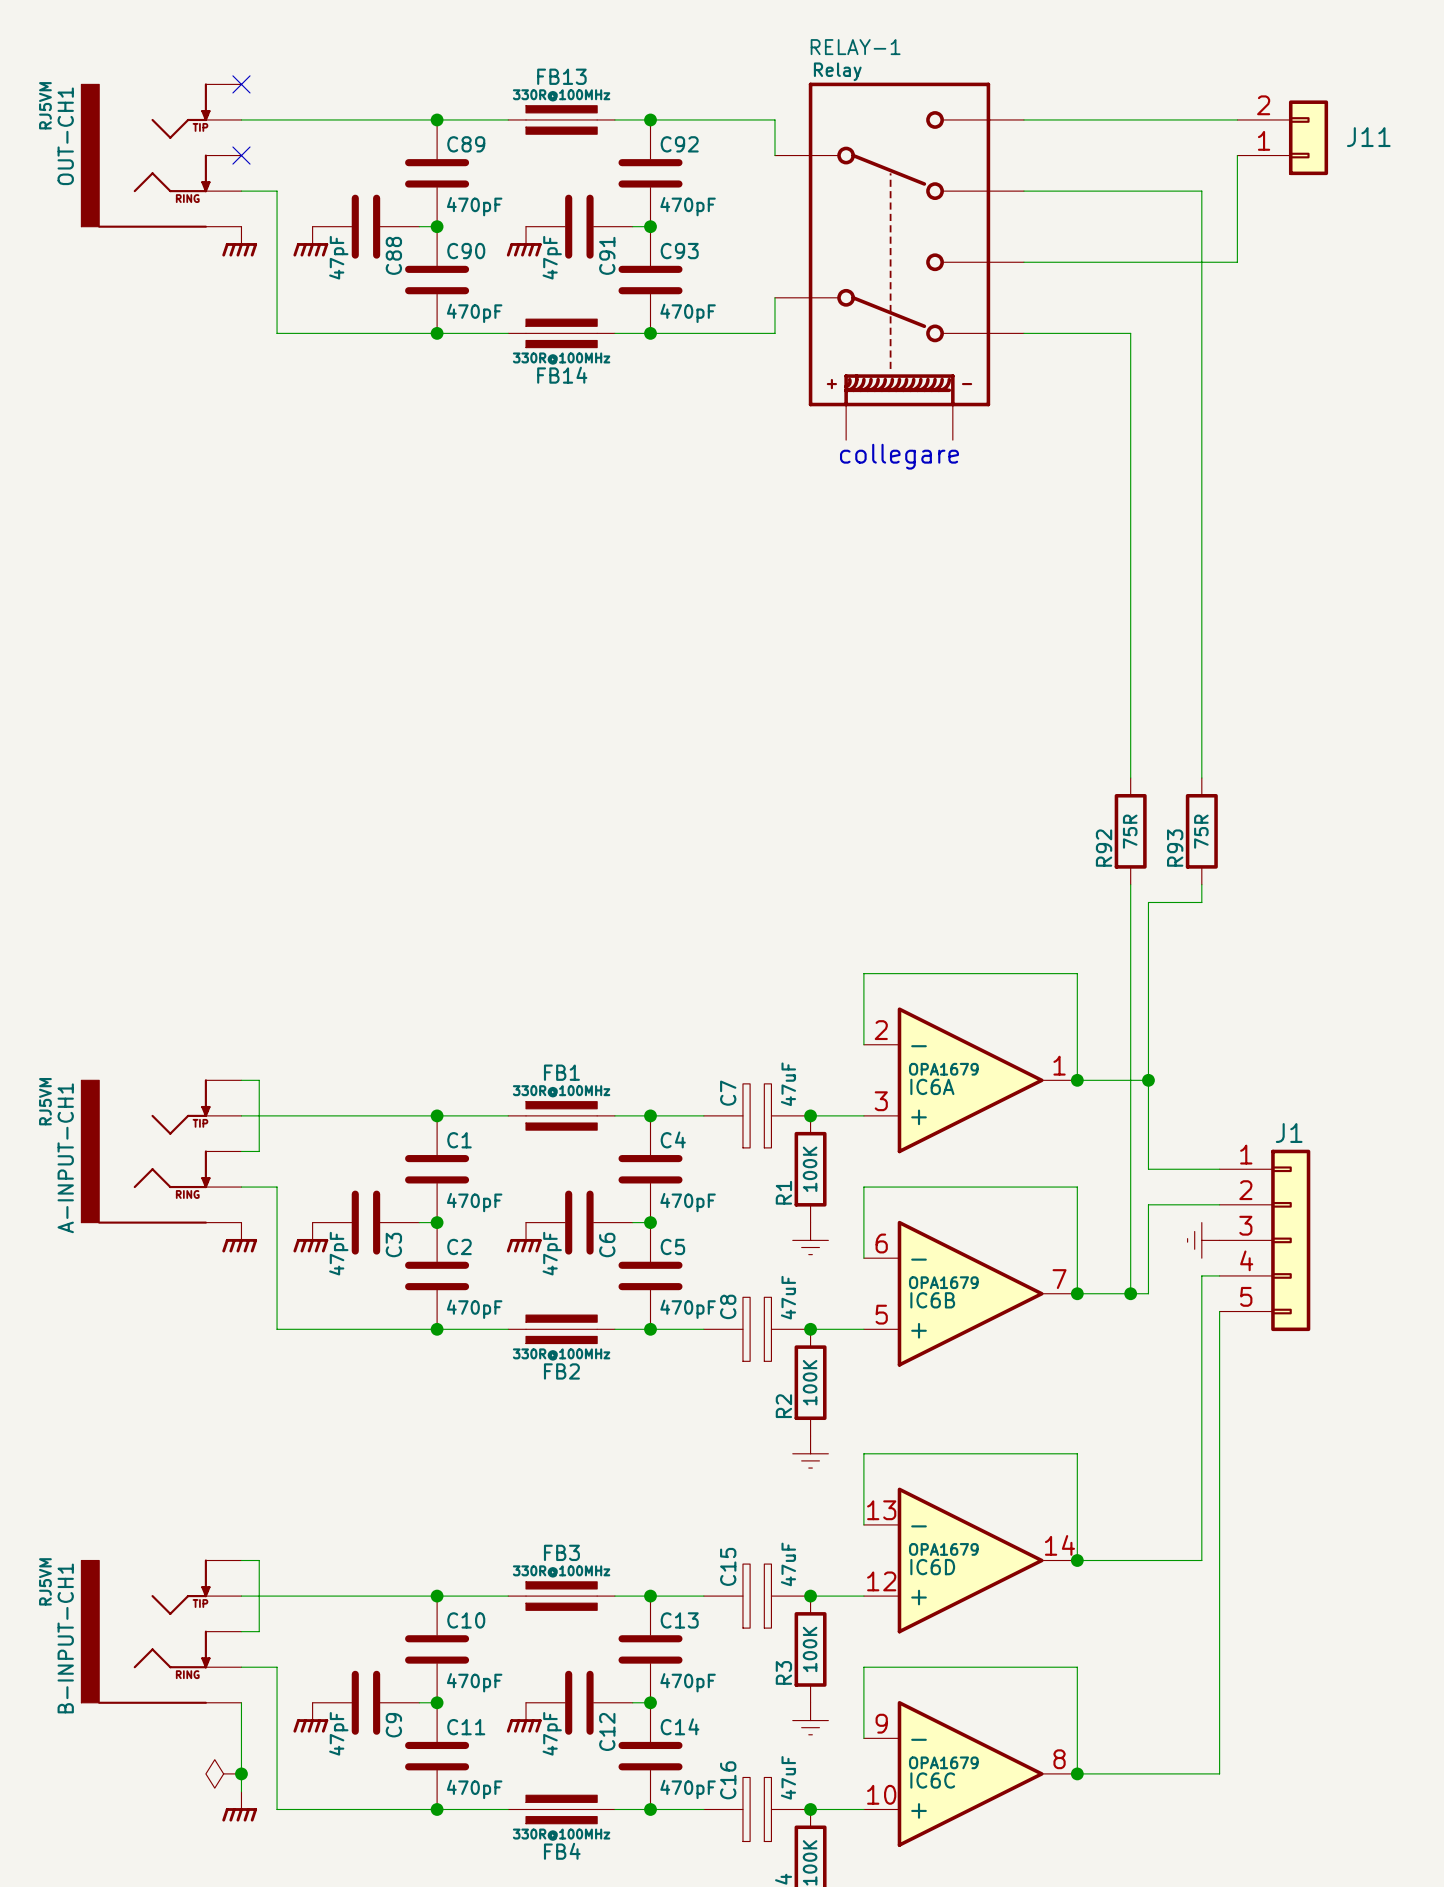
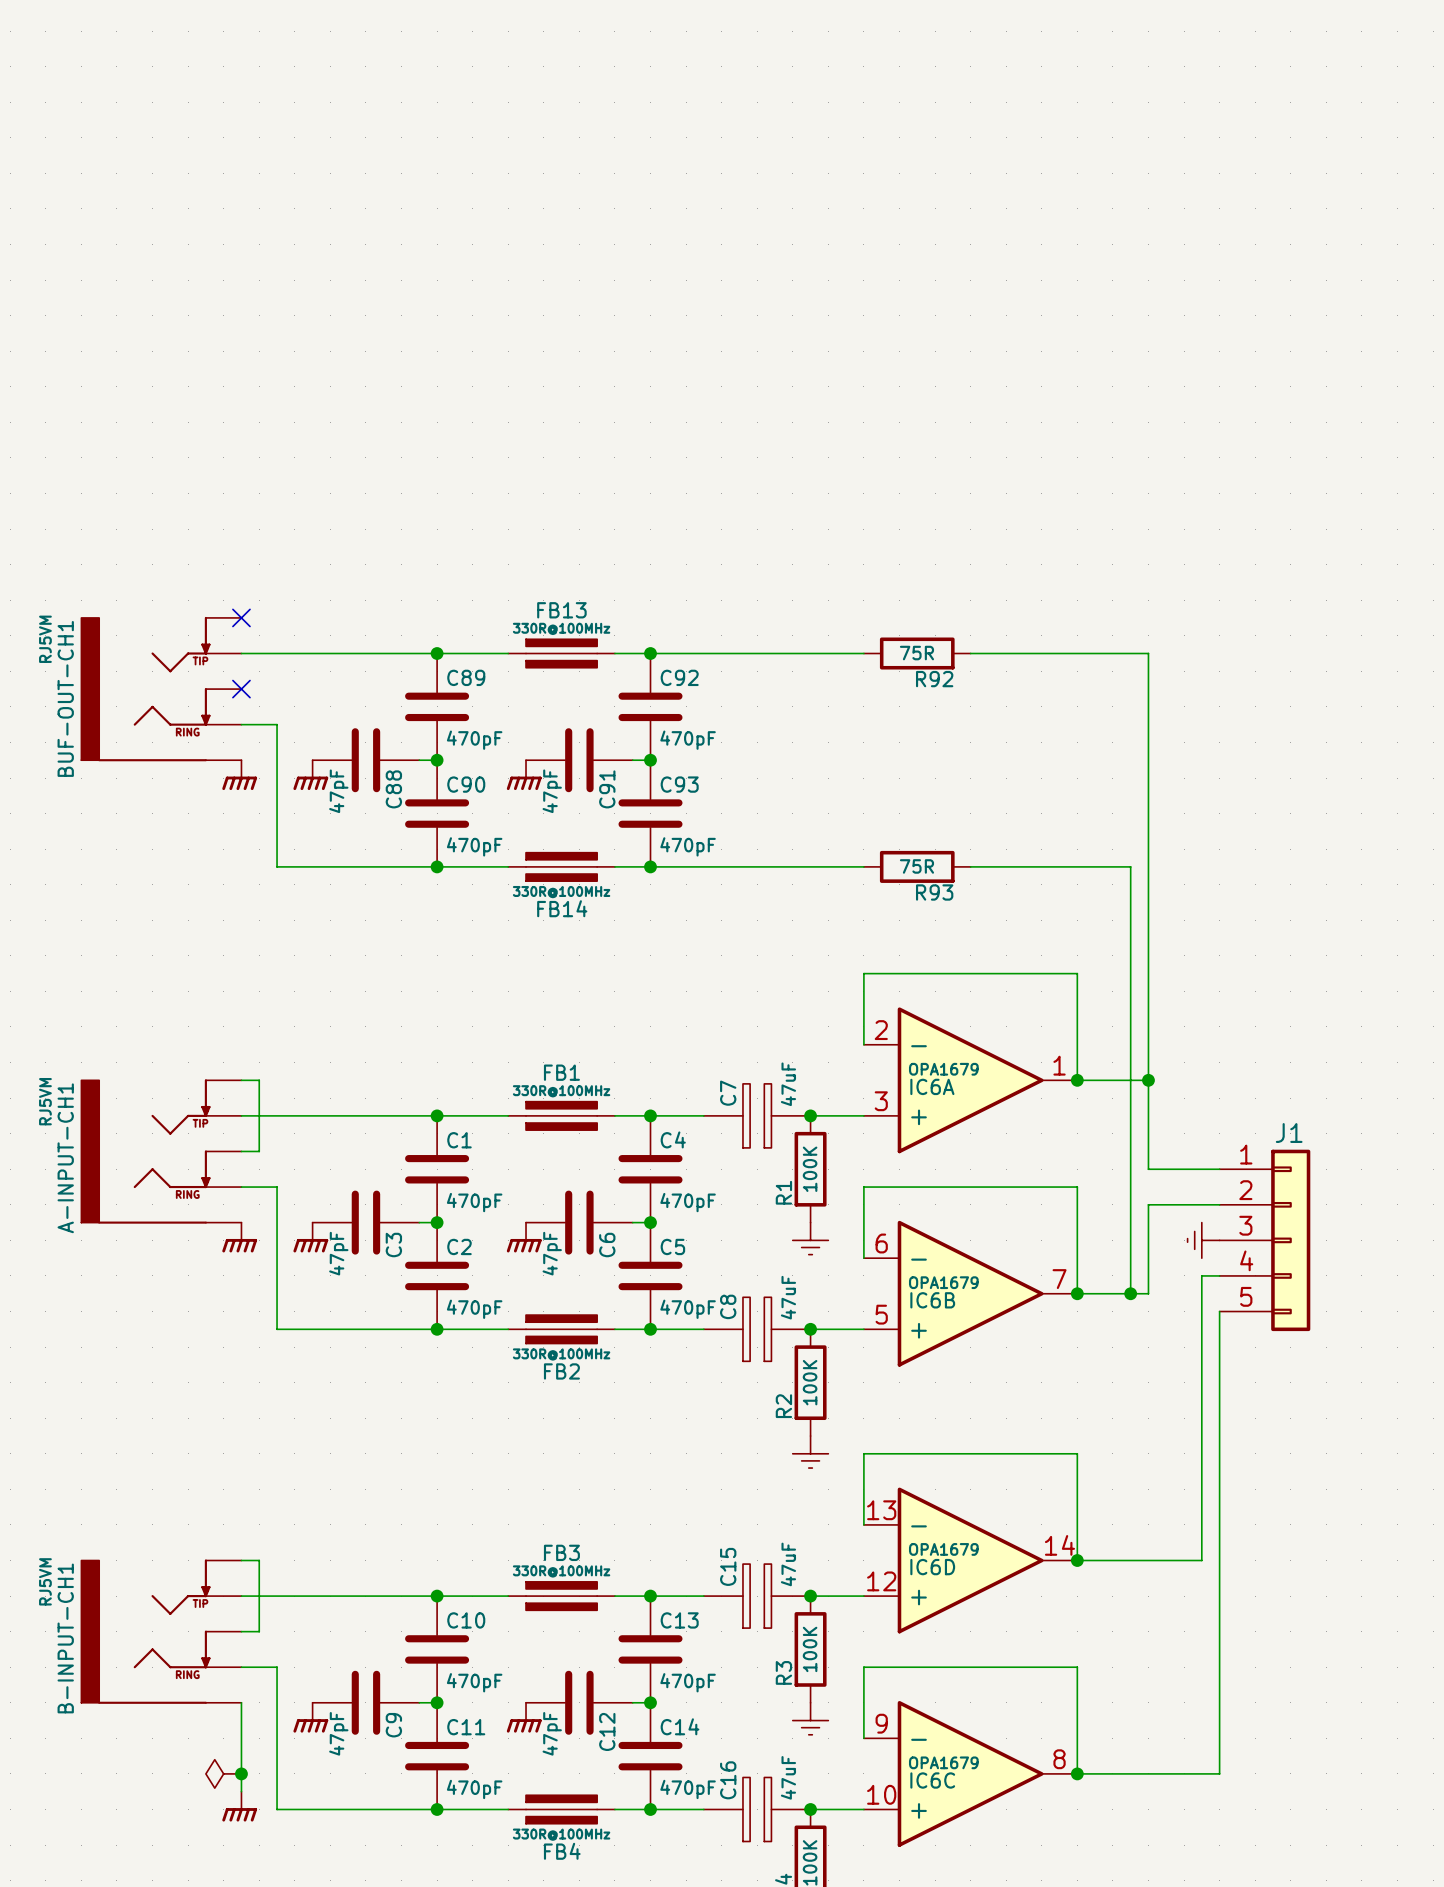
no-connect mark: (241, 84) -> none
wire: (241, 119) (508, 119) -> none
junction: (437, 119) -> none
FB13 position: (561, 119) -> (561, 653)
wire: (614, 119) (774, 119) (774, 155) -> none
junction: (650, 119) -> none
wire: (1023, 119) (1237, 119) -> none
J11: (1282, 137) -> none
OUT-CH1: RJ5VM (161, 155) -> none
no-connect mark: (241, 155) -> none
wire: (1237, 155) (1237, 262) (1023, 262) -> none
C89 position: (437, 173) -> (437, 706)
C92 position: (650, 173) -> (650, 706)
wire: (241, 191) (277, 191) (277, 333) (508, 333) -> none
wire: (1023, 191) (1201, 191) (1201, 778) -> none
C88 position: (365, 226) -> (365, 760)
wire: (419, 226) (437, 226) -> none
junction: (437, 226) -> none
C91 position: (579, 226) -> (579, 760)
wire: (632, 226) (650, 226) -> none
junction: (650, 226) -> none
power symbol: (239, 241) -> none
power symbol: (310, 241) -> none
power symbol: (524, 241) -> none
RELAY-1: Relay (899, 261) -> none
C90 position: (437, 280) -> (437, 813)
C93 position: (650, 280) -> (650, 813)
wire: (774, 297) (774, 333) (614, 333) -> none
junction: (437, 333) -> none
FB14 position: (561, 333) -> (561, 866)
junction: (650, 333) -> none
wire: (1023, 333) (1130, 333) (1130, 778) -> none
text: collegare (899, 456) -> none
no-connect mark: none -> (241, 617)
wire: none -> (241, 653) (508, 653)
junction: none -> (437, 653)
wire: none -> (614, 653) (863, 653)
junction: none -> (650, 653)
BUF-OUT-CH1: none -> RJ5VM (161, 689)
no-connect mark: none -> (241, 689)
wire: none -> (241, 724) (277, 724) (277, 866) (508, 866)
wire: none -> (419, 760) (437, 760)
junction: none -> (437, 760)
wire: none -> (632, 760) (650, 760)
junction: none -> (650, 760)
power symbol: none -> (239, 775)
power symbol: none -> (310, 775)
power symbol: none -> (524, 775)
R92 rotation: 0° (1130, 831) -> 90° clockwise (917, 653)
R92 position: (1130, 831) -> (917, 653)
R93 rotation: 0° (1201, 831) -> 90° clockwise (917, 866)
R93 position: (1201, 831) -> (917, 866)
R92 name position: R92 (1104, 848) -> R92 (934, 679)
R93 name position: R93 (1175, 848) -> R93 (934, 892)
junction: none -> (437, 866)
wire: none -> (614, 866) (863, 866)
junction: none -> (650, 866)
wire: none -> (970, 866) (1130, 866) (1130, 884)
wire: (1201, 884) (1201, 902) (1148, 902) -> (970, 653) (1148, 653) (1148, 902)

